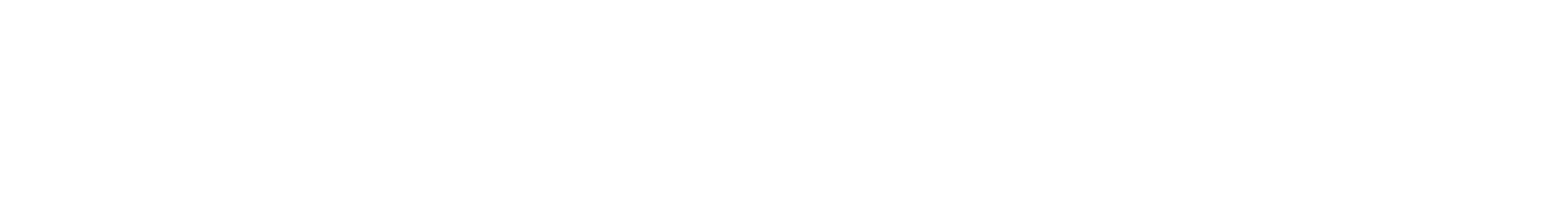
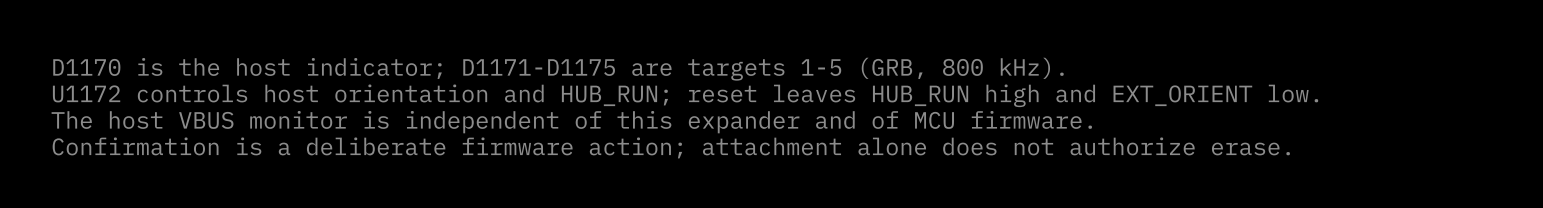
text: none -> D1170 is the host indicator; D1171-D1175 are targets 1-5 (GRB, 800 kHz). (558, 69)
text: none -> U1172 controls host orientation and HUB_RUN; reset leaves HUB_RUN high and EXT_ORIENT low. (685, 95)
text: none -> The host VBUS monitor is independent of this expander and of MCU firmware. (571, 122)
text: none -> Confirmation is a deliberate firmware action; attachment alone does not authorize erase. (671, 147)

